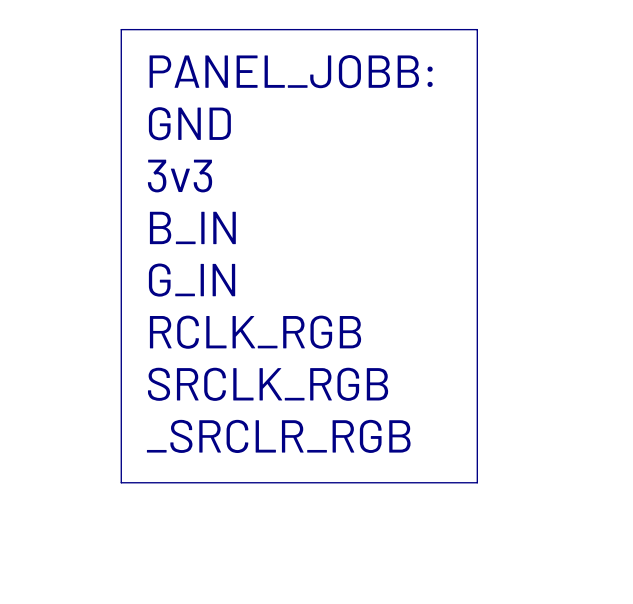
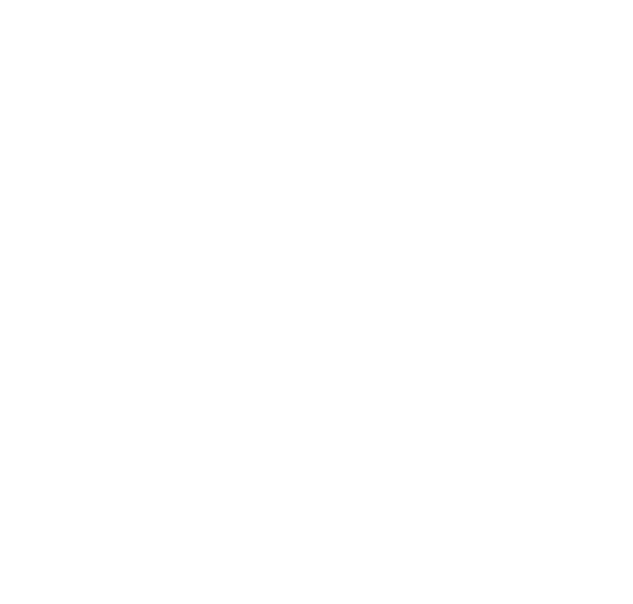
line: (121, 29) (477, 29) (477, 482) (121, 482) (121, 29) -> none
text: PANEL_JOBB: (291, 71) -> none
text: GND (189, 123) -> none
text: 3v3 (180, 176) -> none
text: B_IN (192, 227) -> none
text: G_IN (192, 280) -> none
text: RCLK_RGB (255, 332) -> none
text: SRCLK_RGB (268, 384) -> none
text: _SRCLR_RGB (278, 436) -> none

